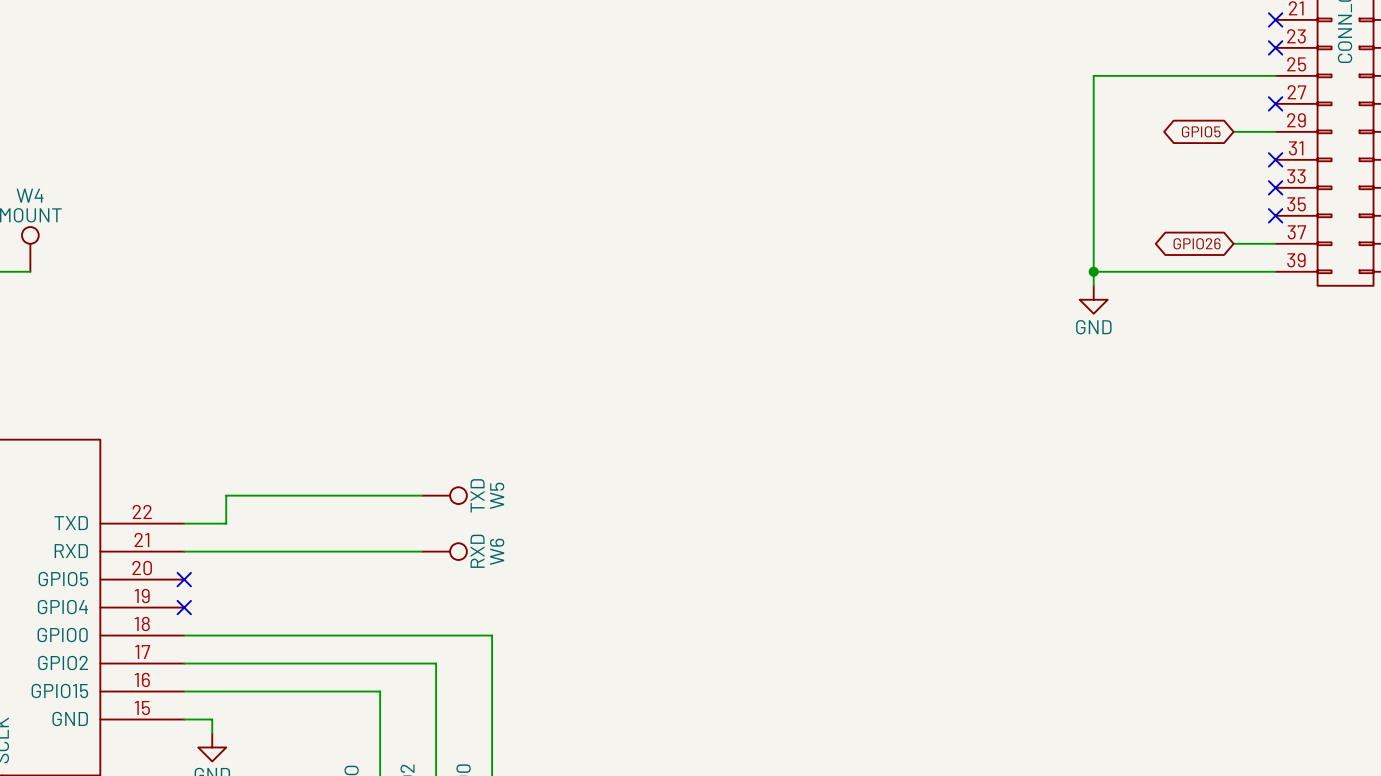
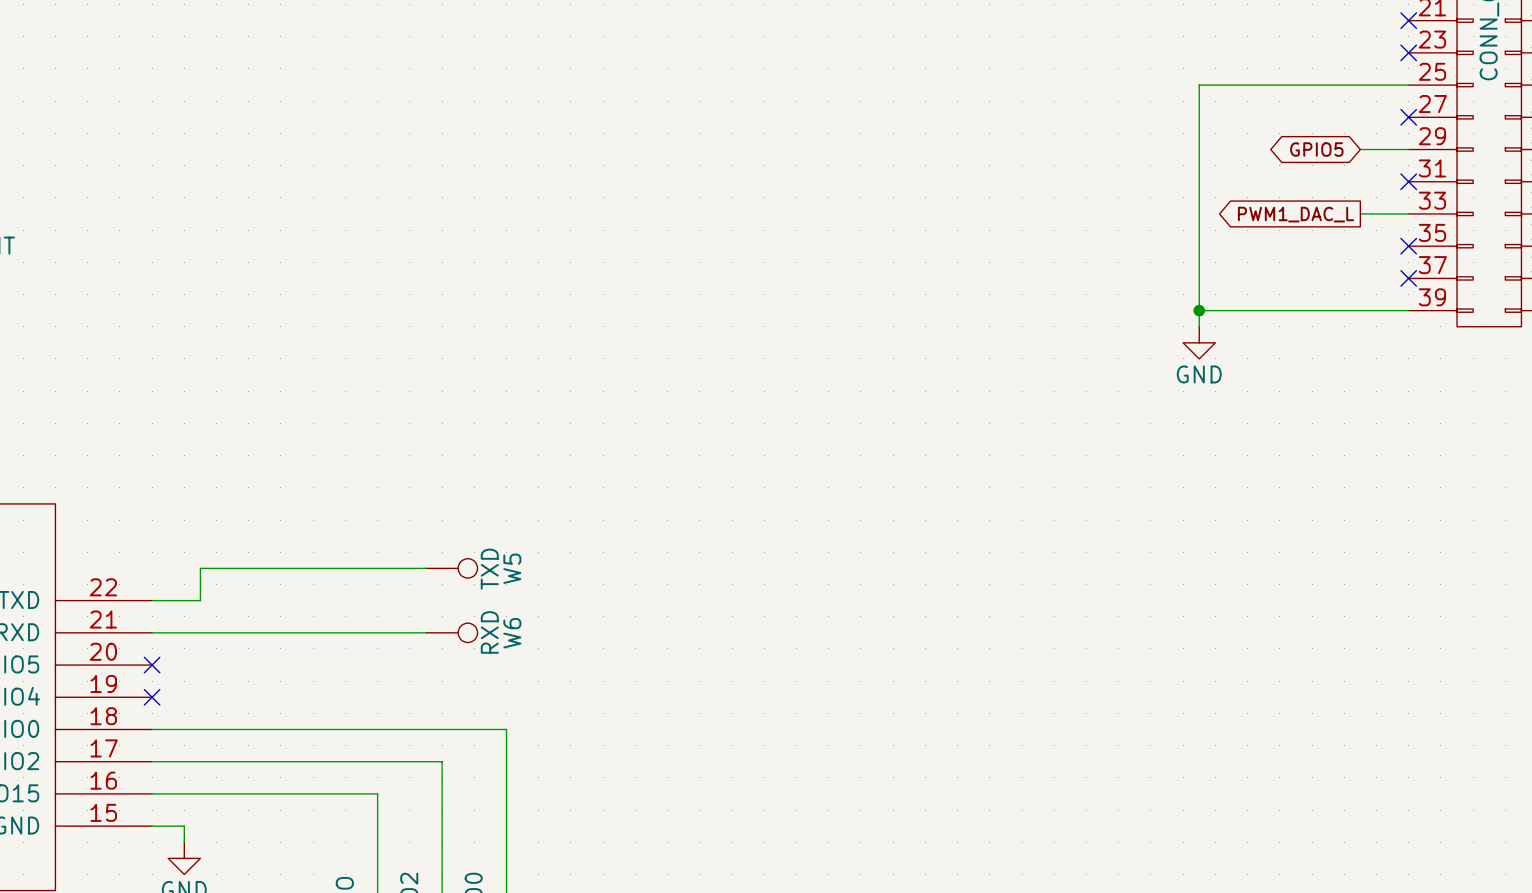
global label: none -> PWM1_DAC_L (1296, 214)
no-connect mark position: (1275, 187) -> (1408, 278)
global label: GPIO26 (1197, 243) -> none
wire: (1233, 243) (1275, 243) -> (1360, 213) (1408, 213)

